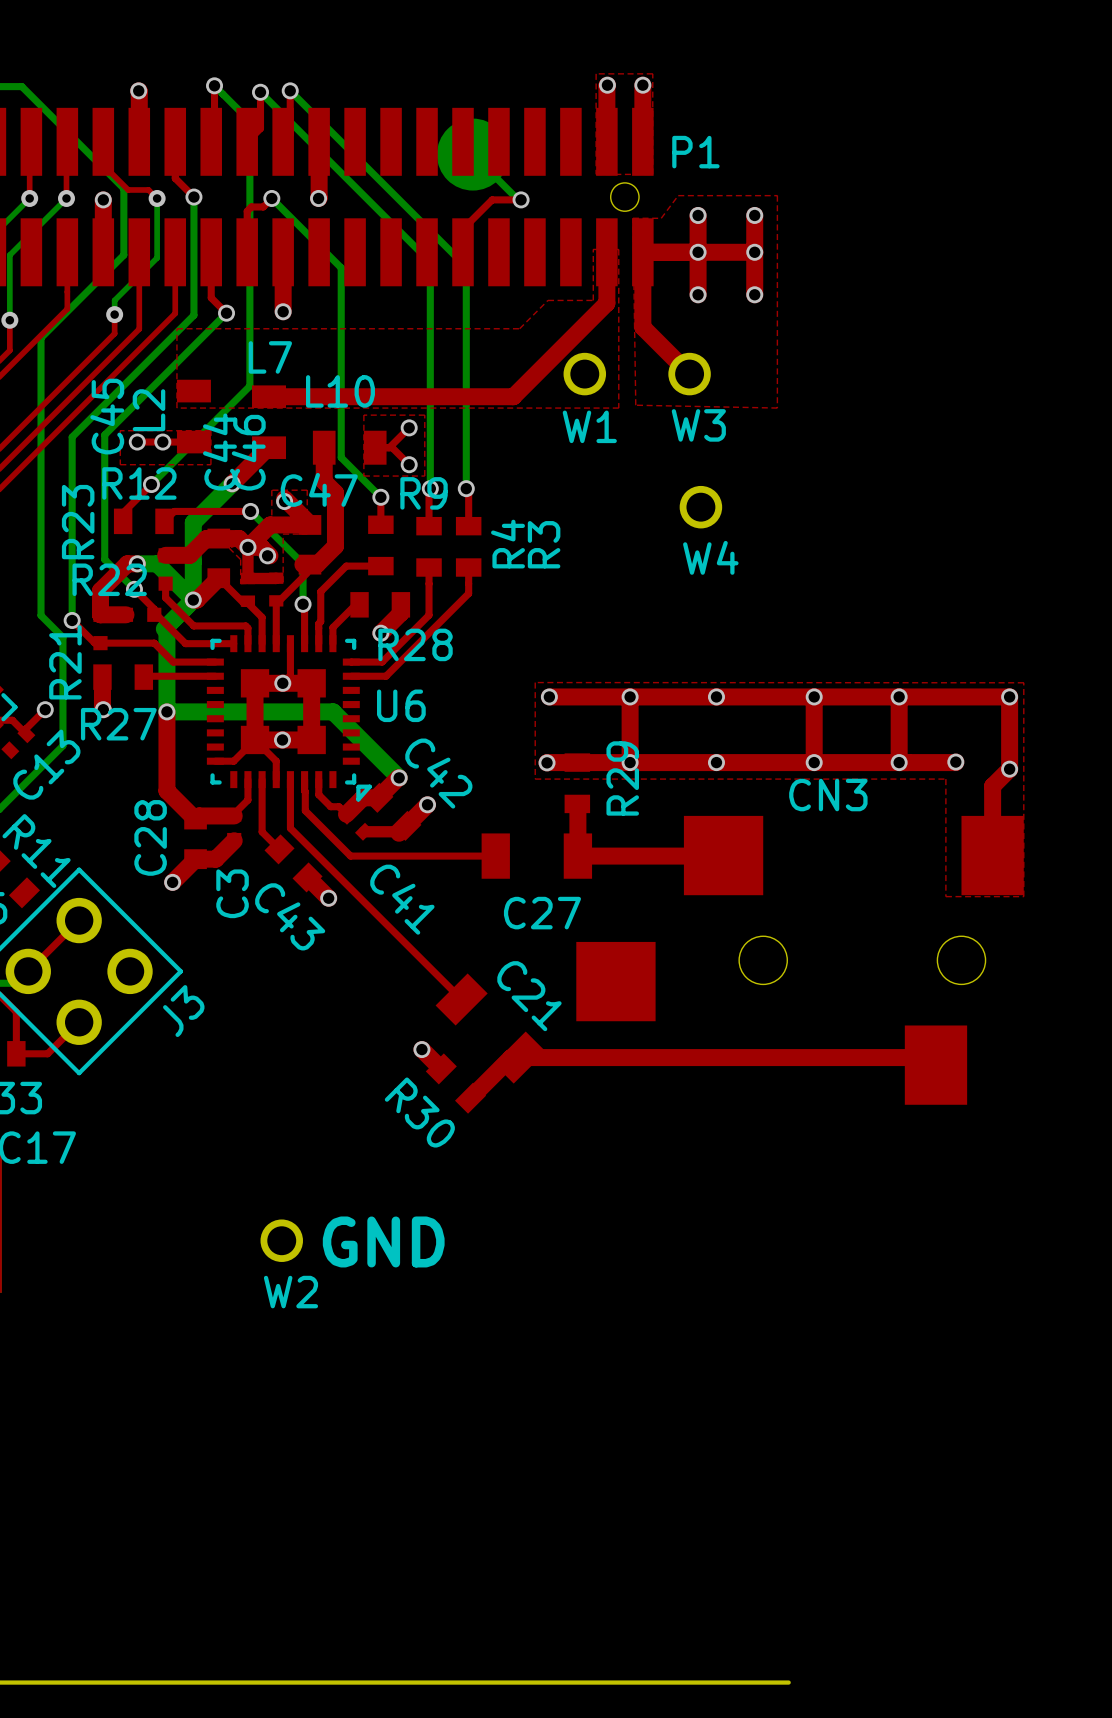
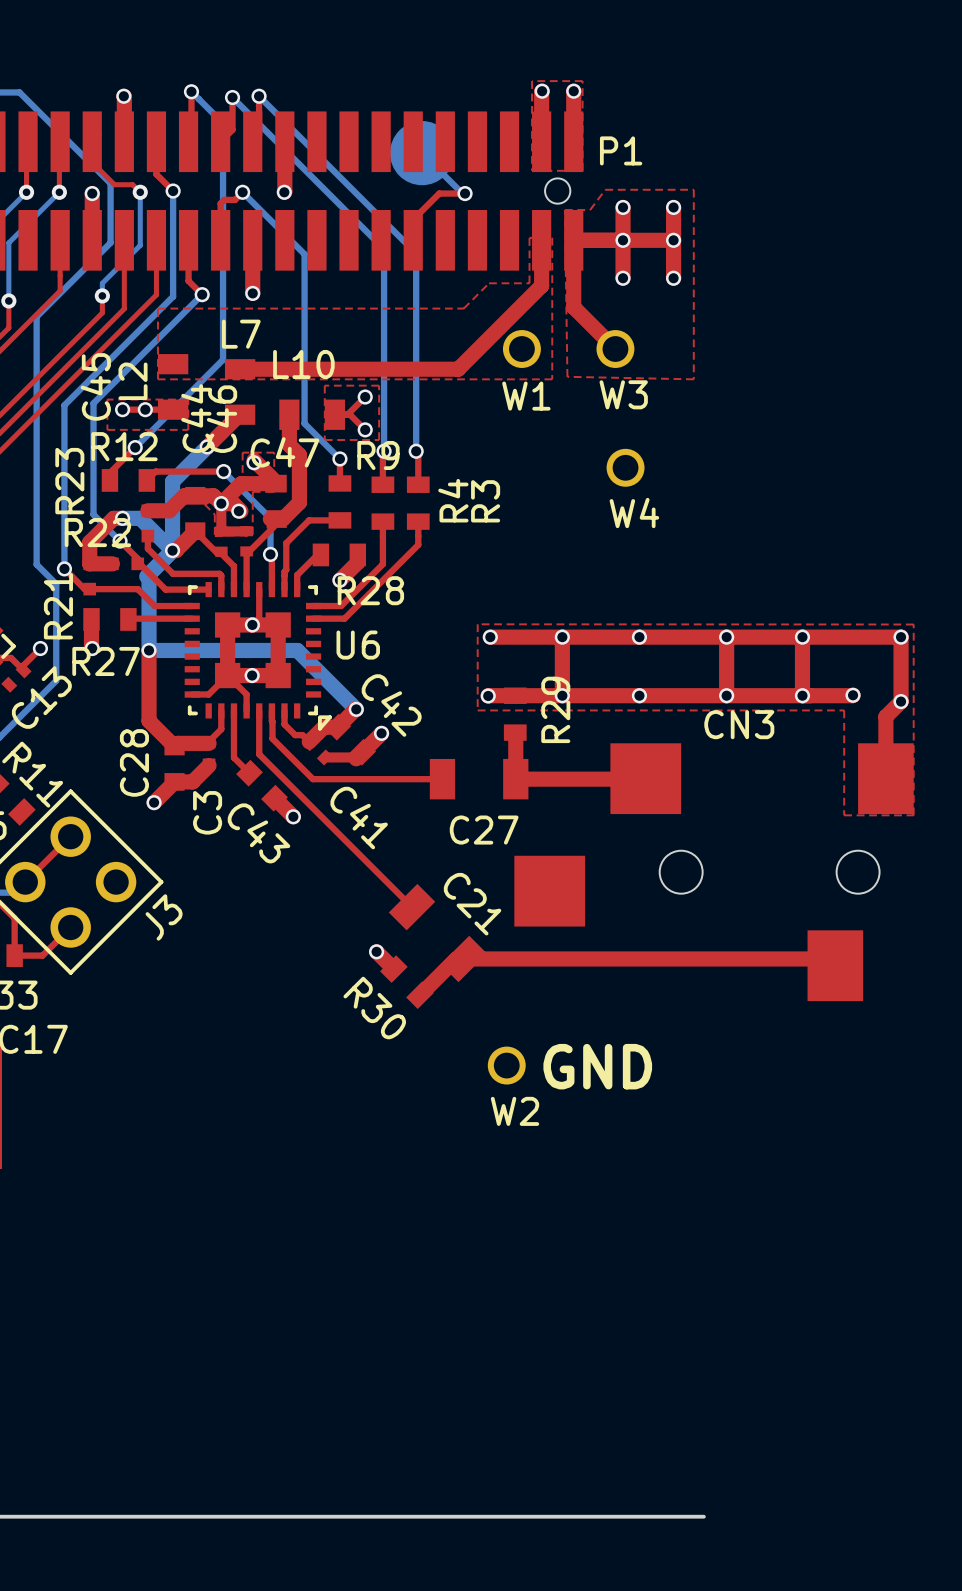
W2 position: (281, 1240) -> (506, 1065)
text position: GND (383, 1241) -> GND (597, 1066)

